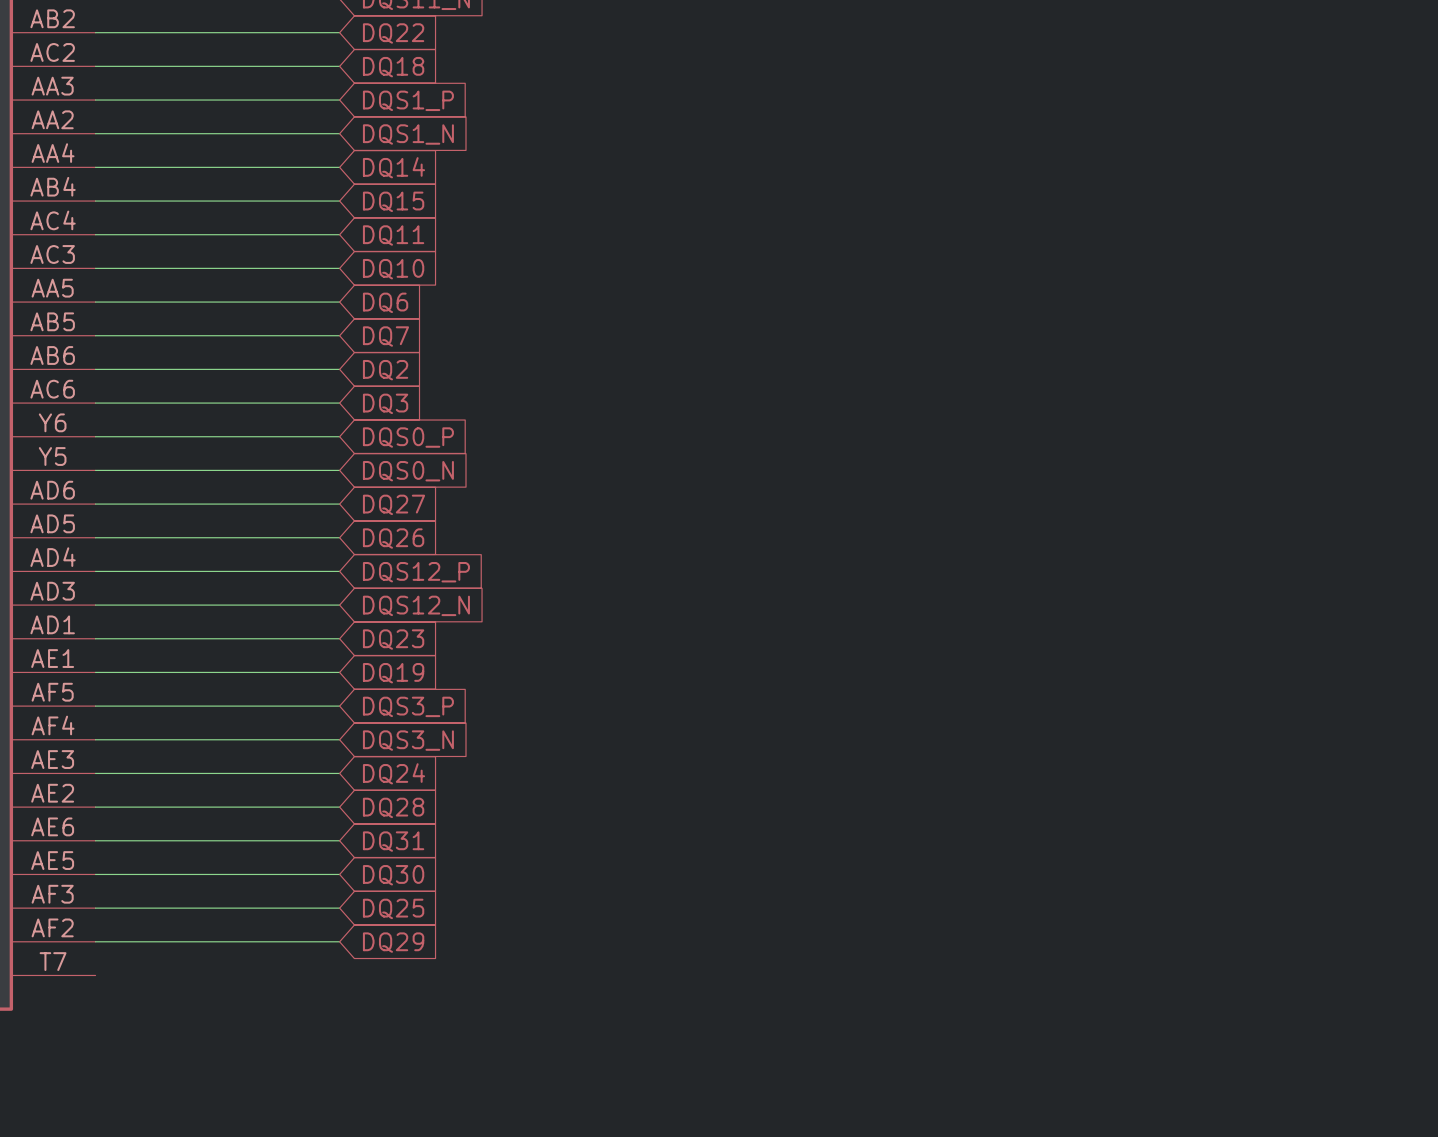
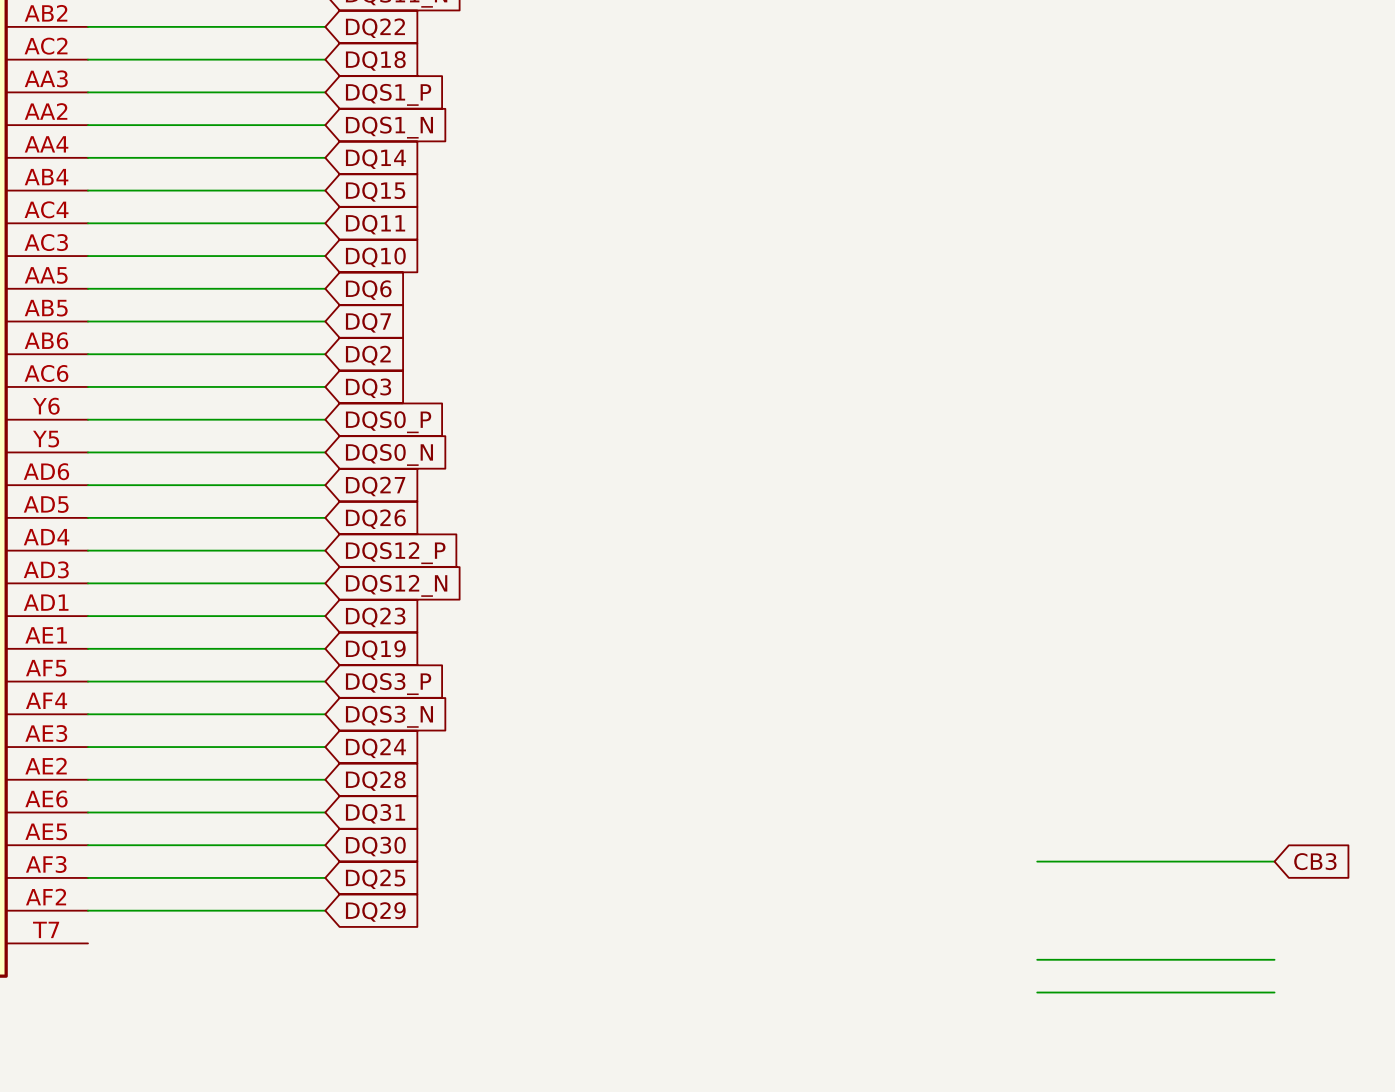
wire: none -> (1037, 861) (1274, 861)
global label: none -> CB3 (1315, 861)
wire: none -> (1037, 959) (1274, 959)
wire: none -> (1037, 992) (1274, 992)

